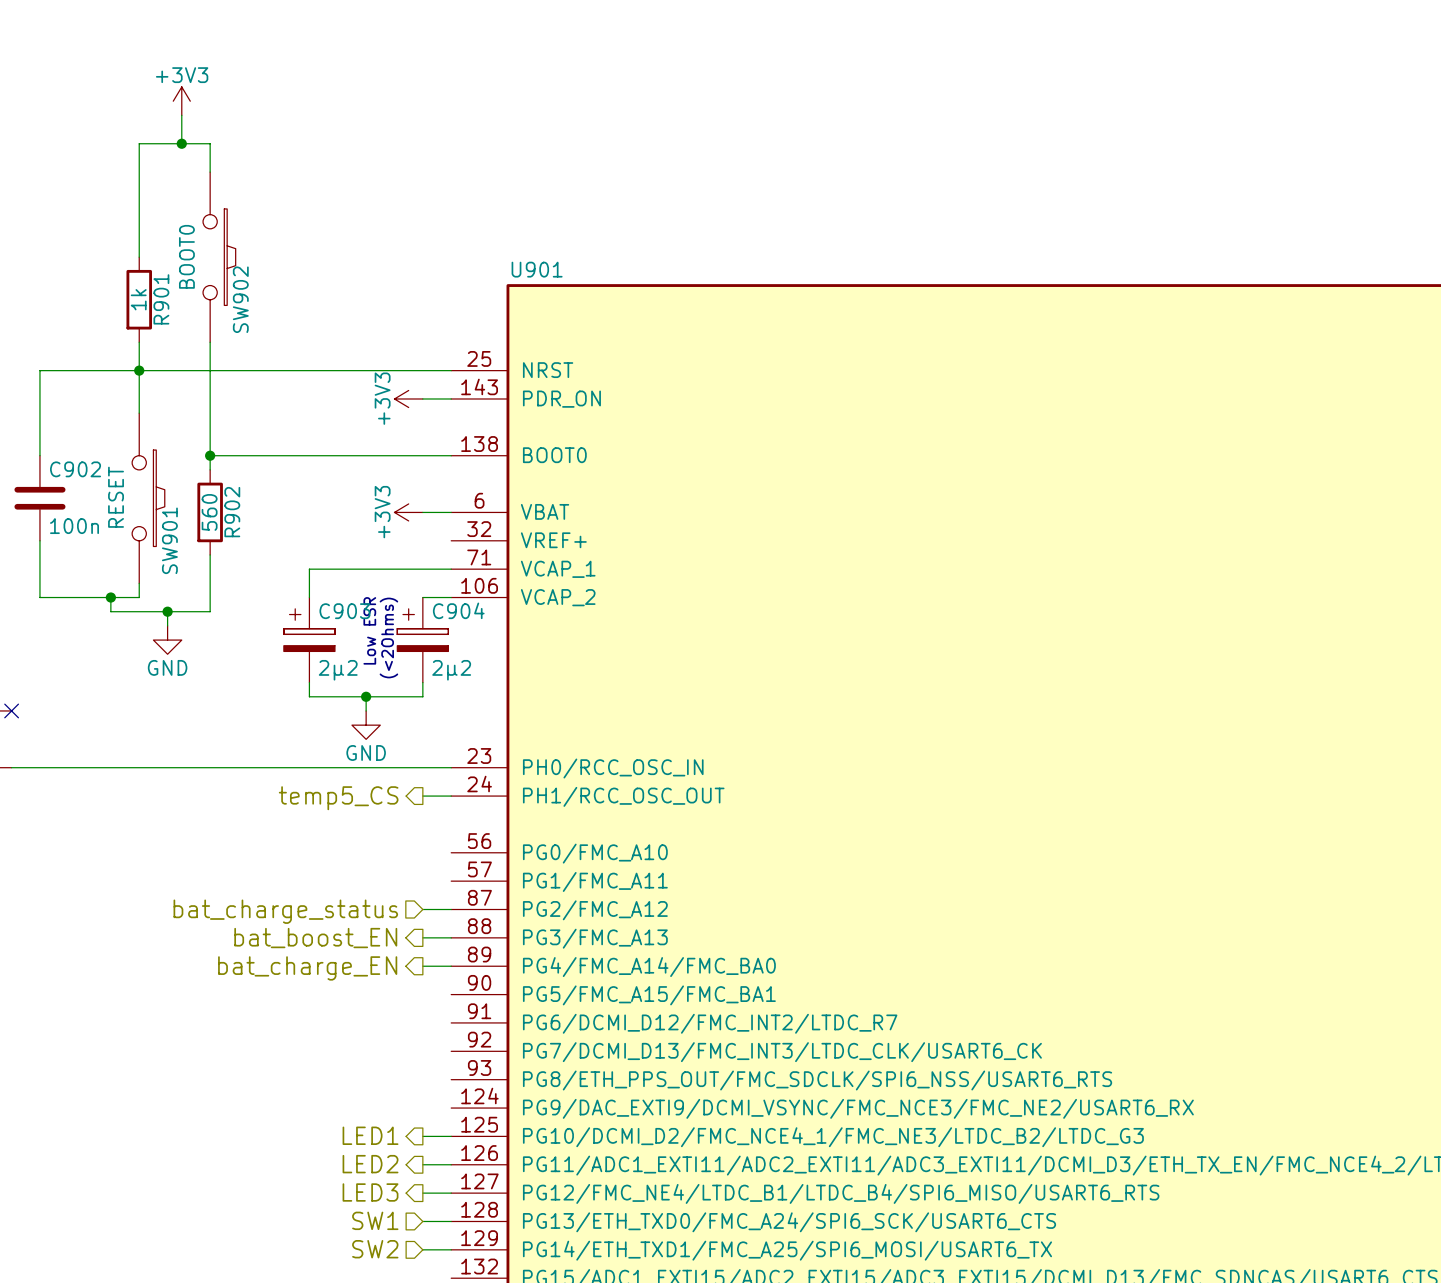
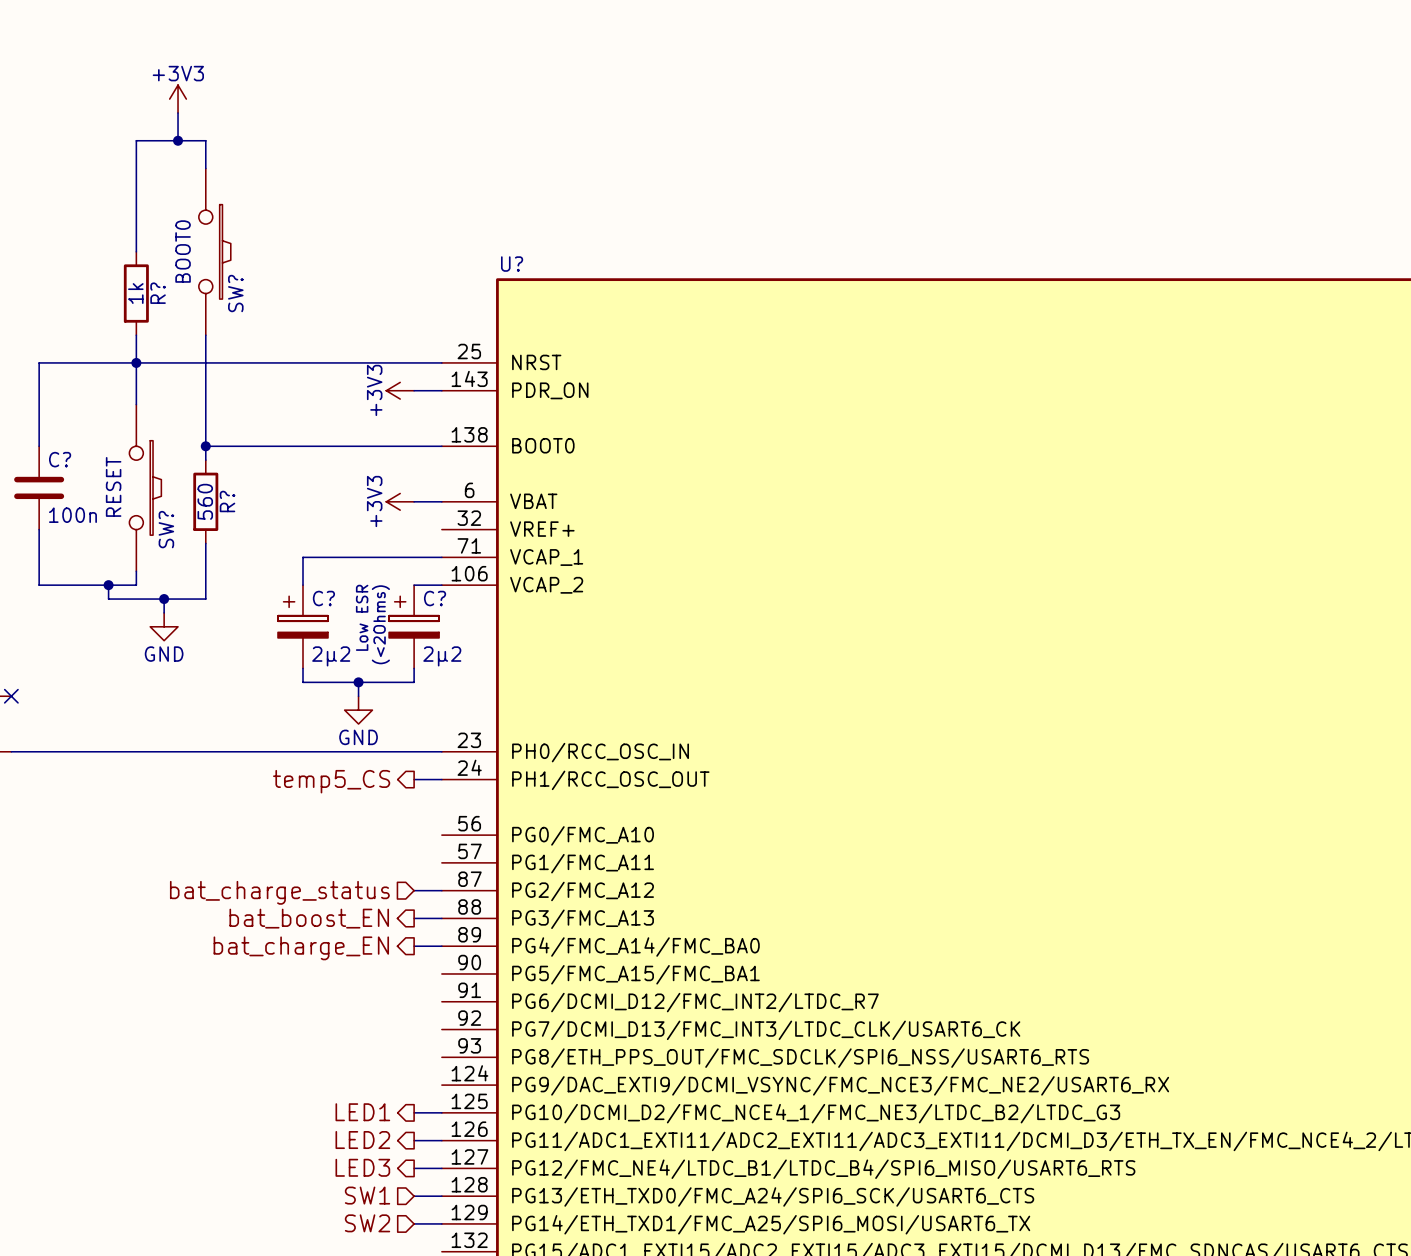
U901 name: U901 (537, 269) -> U? (512, 264)
R901 name: R901 (161, 299) -> R? (158, 293)
SW902 name: SW902 (240, 299) -> SW? (235, 293)
C902 name: C902 (75, 469) -> C? (60, 459)
R902 name: R902 (232, 512) -> R? (227, 501)
SW901 name: SW901 (169, 540) -> SW? (166, 529)
C904 name: C904 (458, 610) -> C? (435, 598)
C903 name: C903 (344, 611) -> C? (323, 598)

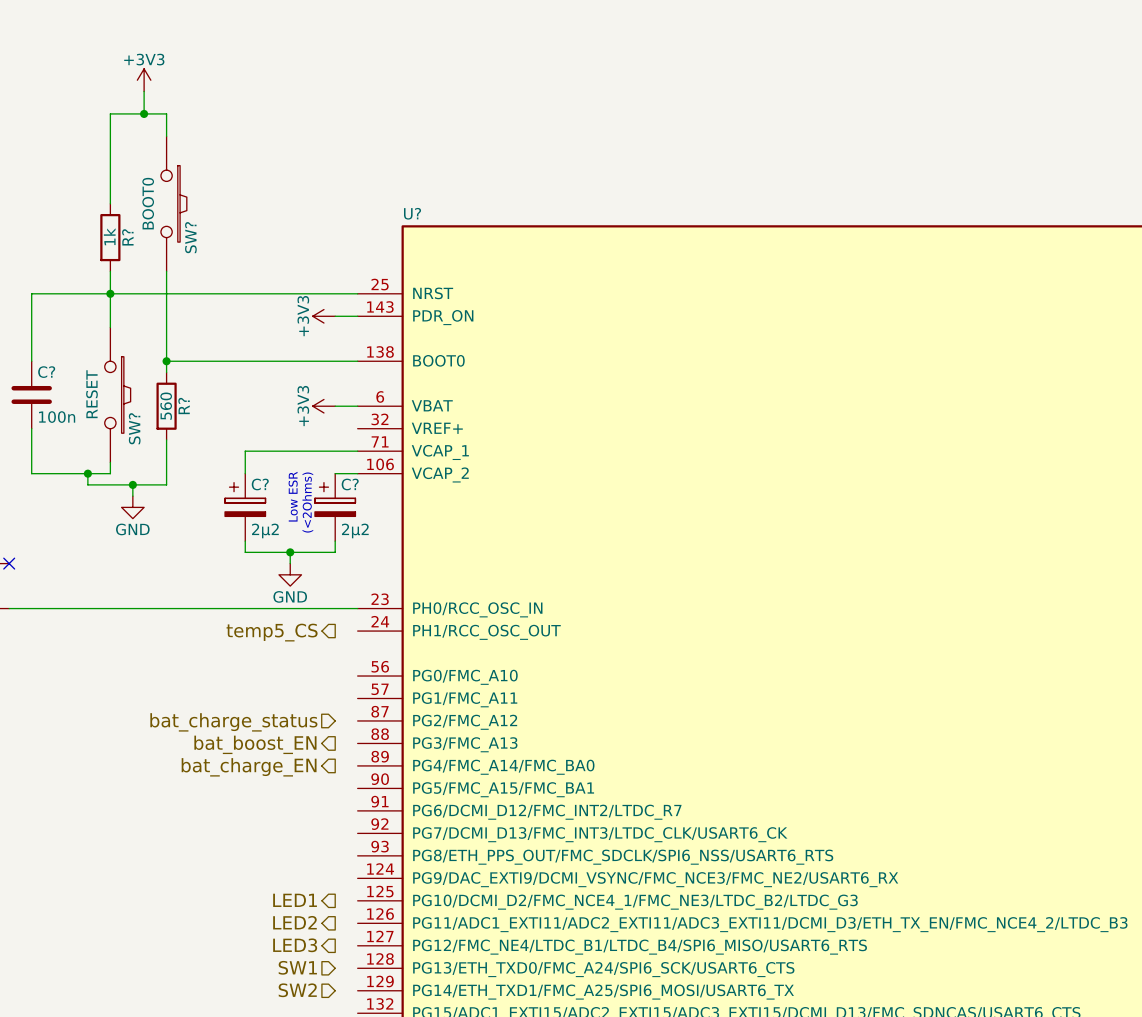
wire: (414, 779) (441, 779) -> none
wire: (414, 890) (441, 890) -> none
wire: (414, 918) (441, 918) -> none
wire: (414, 946) (441, 946) -> none
wire: (414, 1112) (441, 1112) -> none
wire: (414, 1140) (441, 1140) -> none
wire: (414, 1168) (441, 1168) -> none
wire: (414, 1196) (441, 1196) -> none
wire: (414, 1223) (441, 1223) -> none

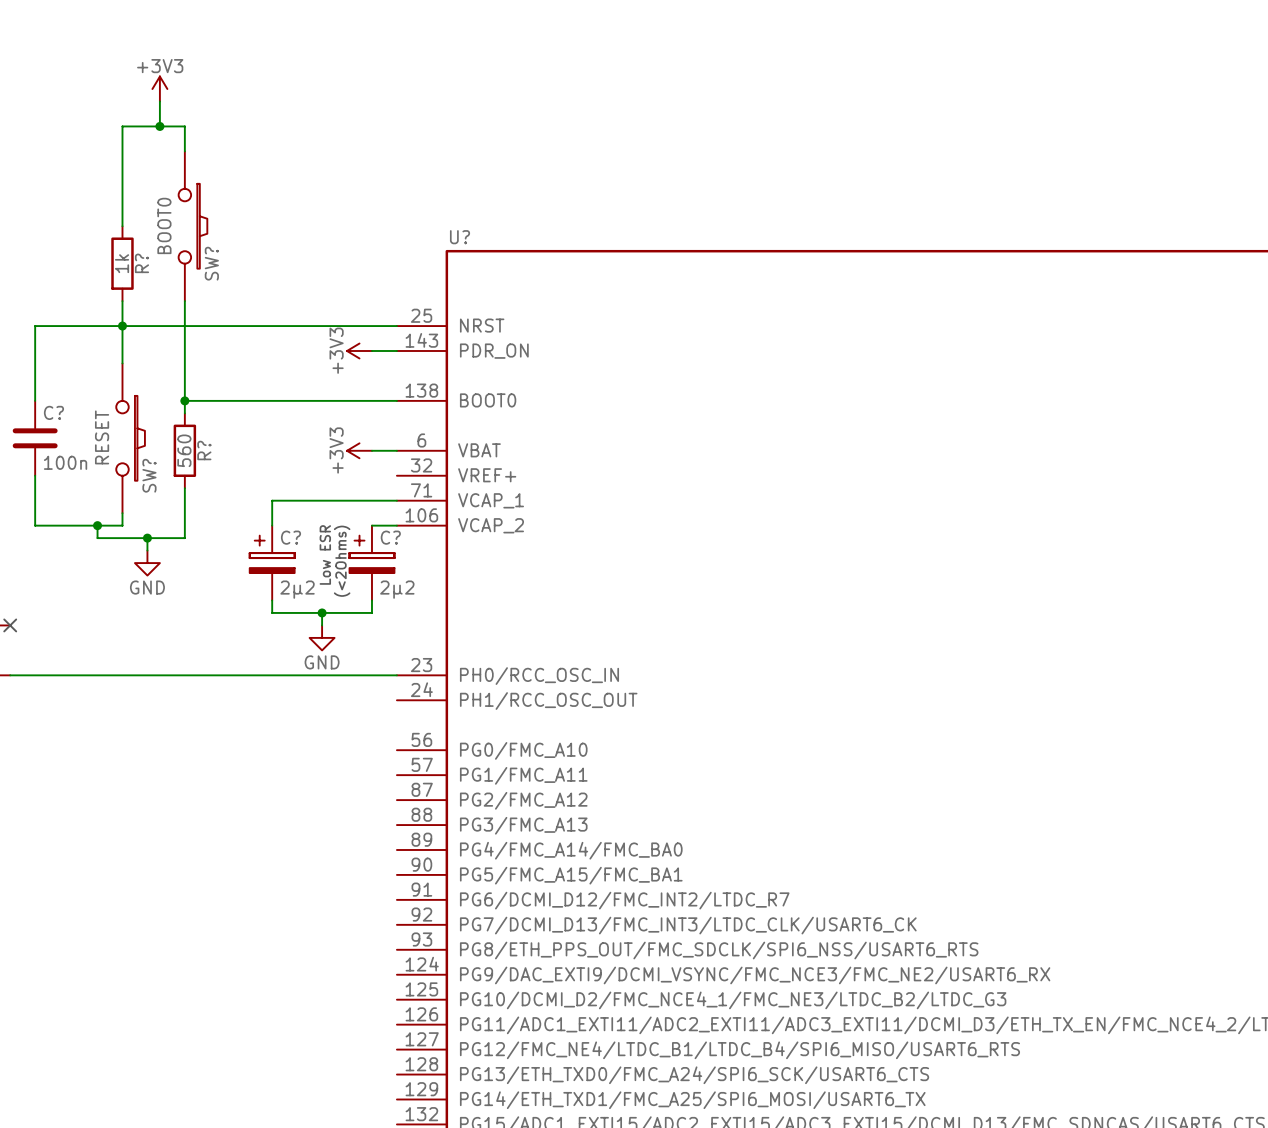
hierarchical label: temp5_CS (272, 632) -> none
hierarchical label: bat_charge_status (233, 722) -> none
hierarchical label: bat_boost_EN (255, 744) -> none
hierarchical label: bat_charge_EN (249, 767) -> none
hierarchical label: LED1 (295, 900) -> none
hierarchical label: LED2 (294, 922) -> none
hierarchical label: LED3 (295, 945) -> none
hierarchical label: SW1 (297, 967) -> none
hierarchical label: SW2 (297, 990) -> none

